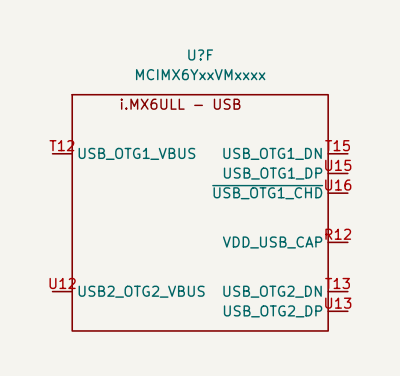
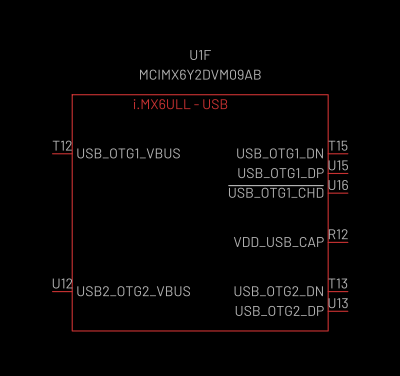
U?F name: U?F (200, 54) -> U1F (200, 55)
U?F value: MCIMX6YxxVMxxxx (200, 74) -> MCIMX6Y2DVM09AB (200, 74)

